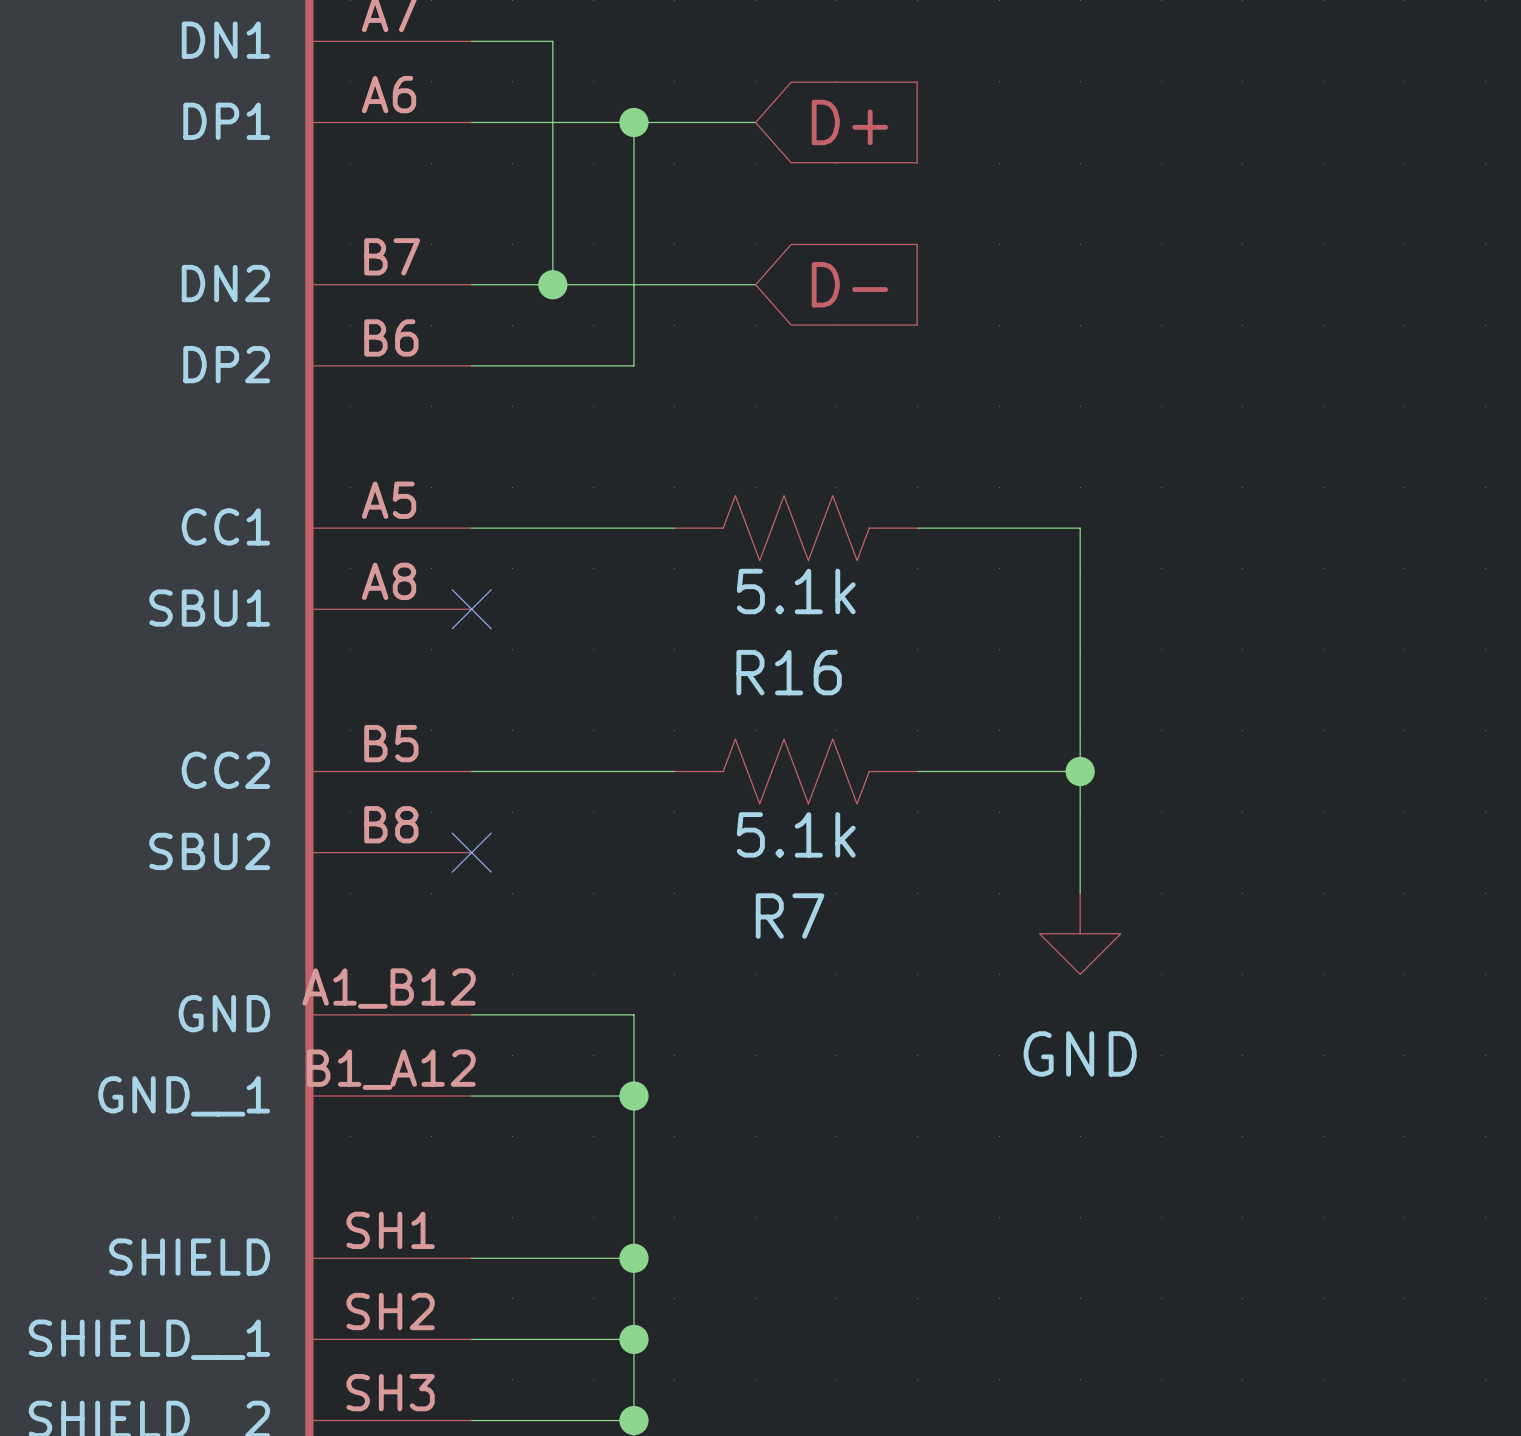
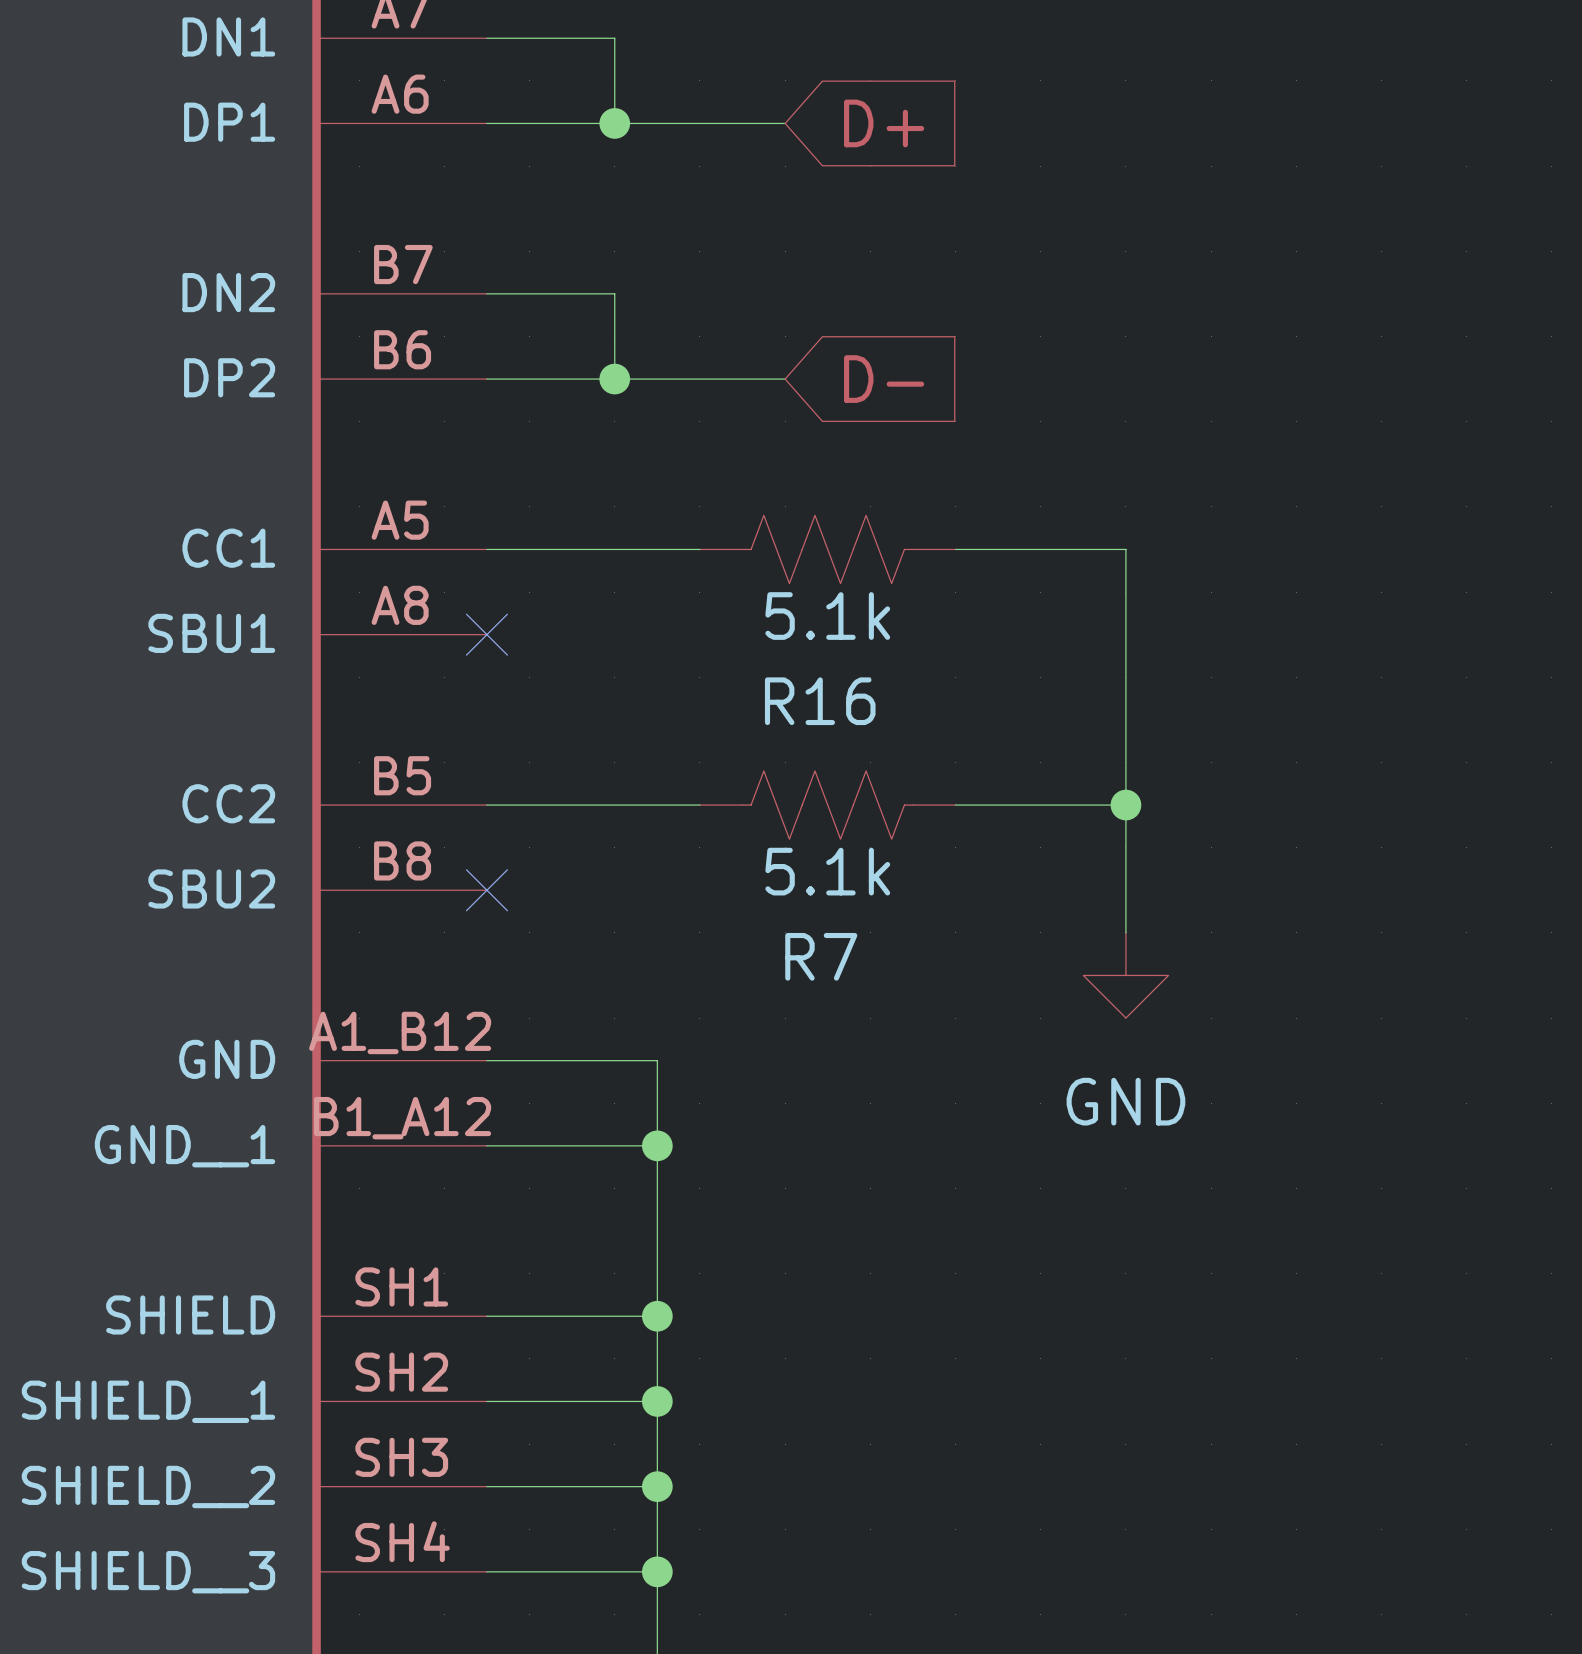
wire: (552, 41) (552, 284) -> (572, 38) (614, 38) (614, 123)
wire: (633, 122) (633, 365) -> (785, 379) (657, 379)
junction position: (633, 122) -> (614, 123)
junction: (552, 284) -> none
wire: (593, 284) (755, 284) -> (614, 293) (614, 379)
global label position: D- (849, 284) -> D- (884, 379)
junction: none -> (614, 379)

